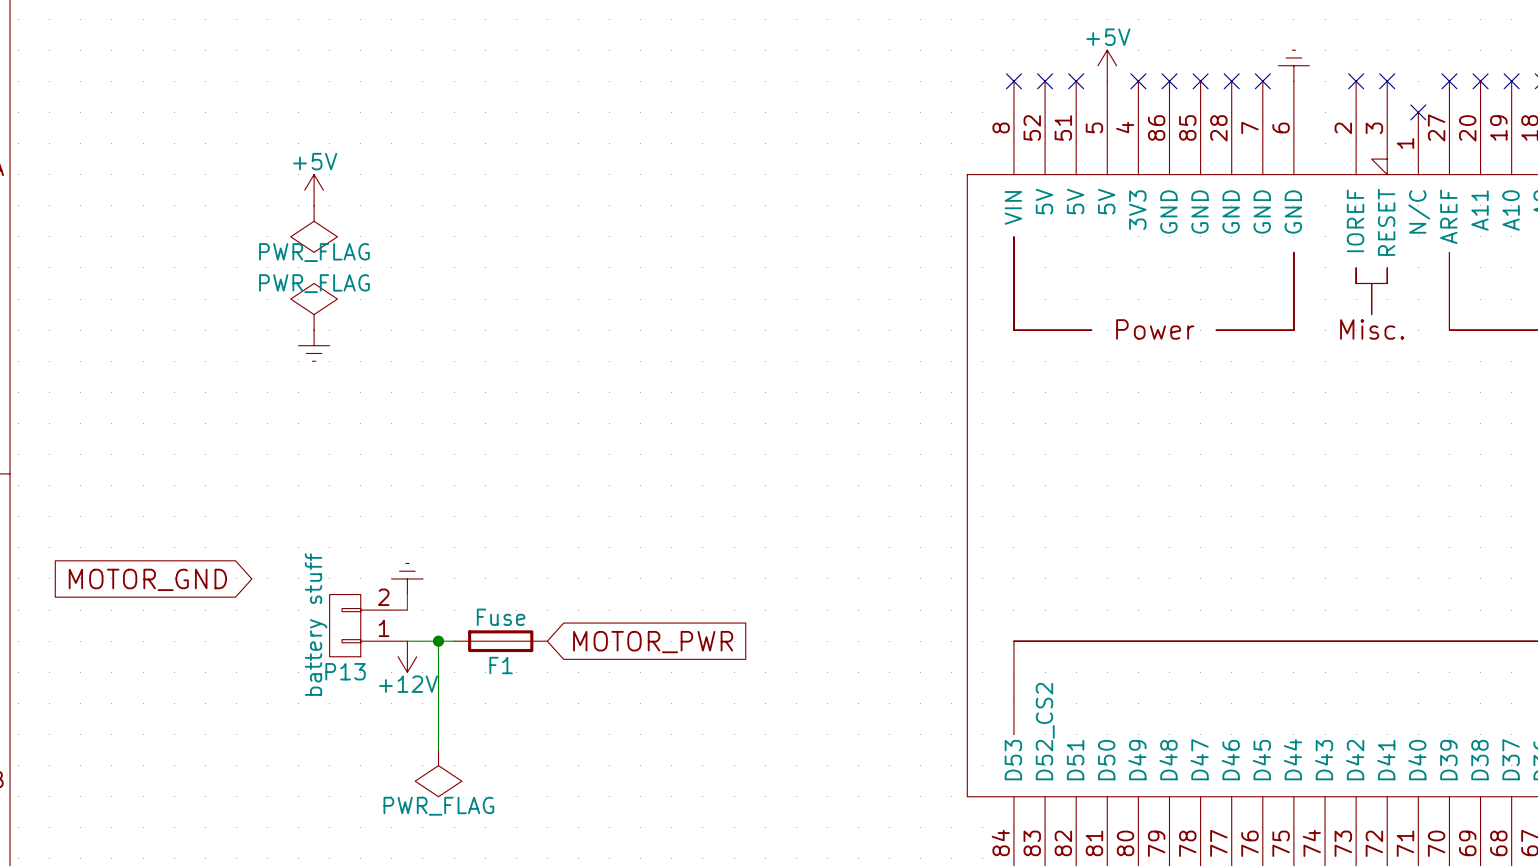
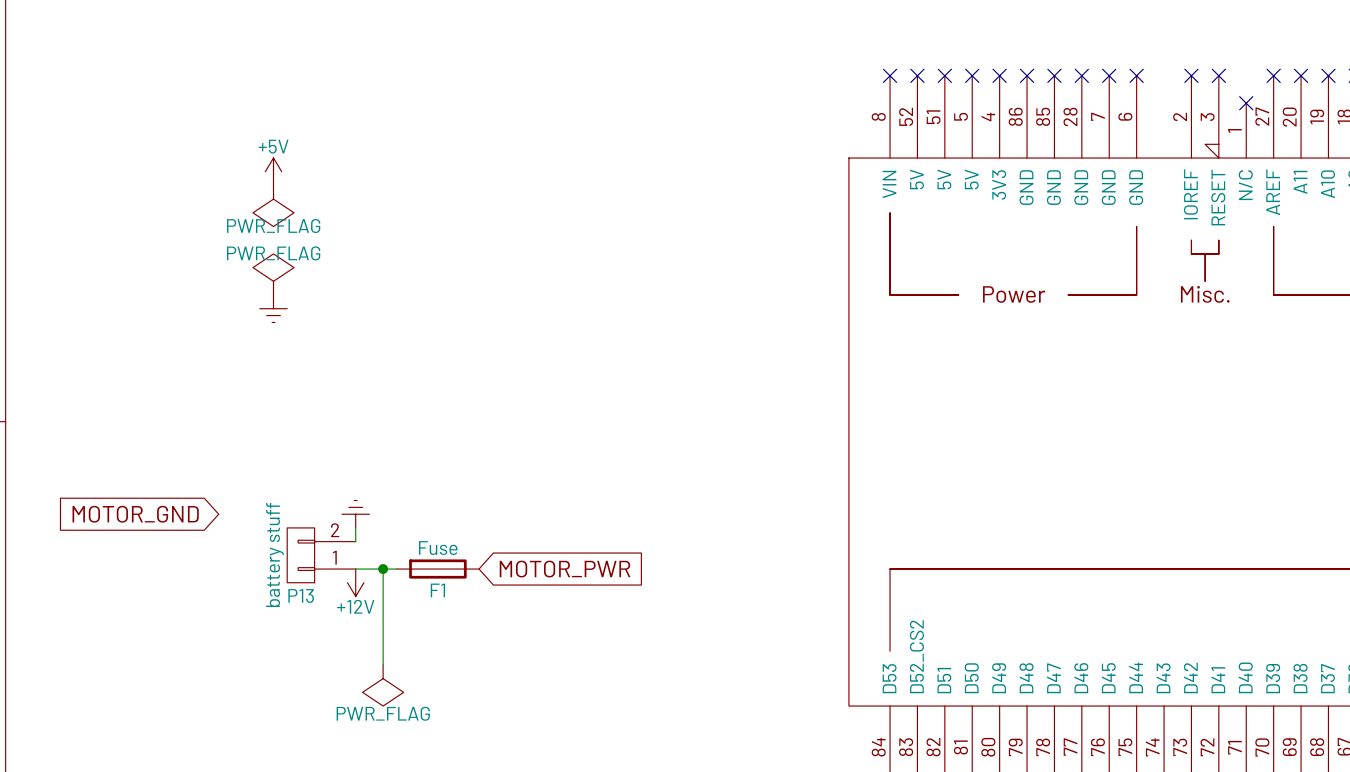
power symbol: +5V (1107, 65) -> none
power symbol: (1293, 65) -> none
no-connect mark: none -> (972, 75)
no-connect mark: none -> (1136, 75)

